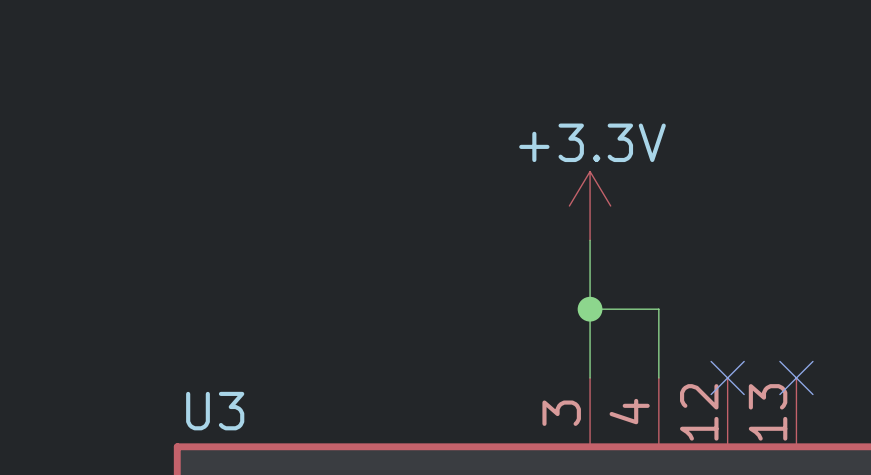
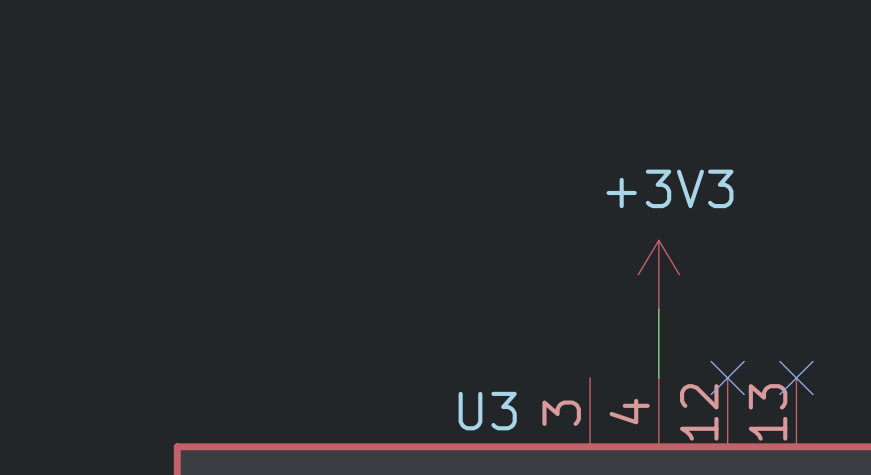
power symbol: +3.3V (590, 205) -> none
wire: (590, 240) (590, 377) -> none
power symbol: none -> +3V3 (658, 274)
wire: (590, 309) (658, 309) -> none
junction: (590, 309) -> none
U3 name position: U3 (215, 411) -> U3 (487, 411)

